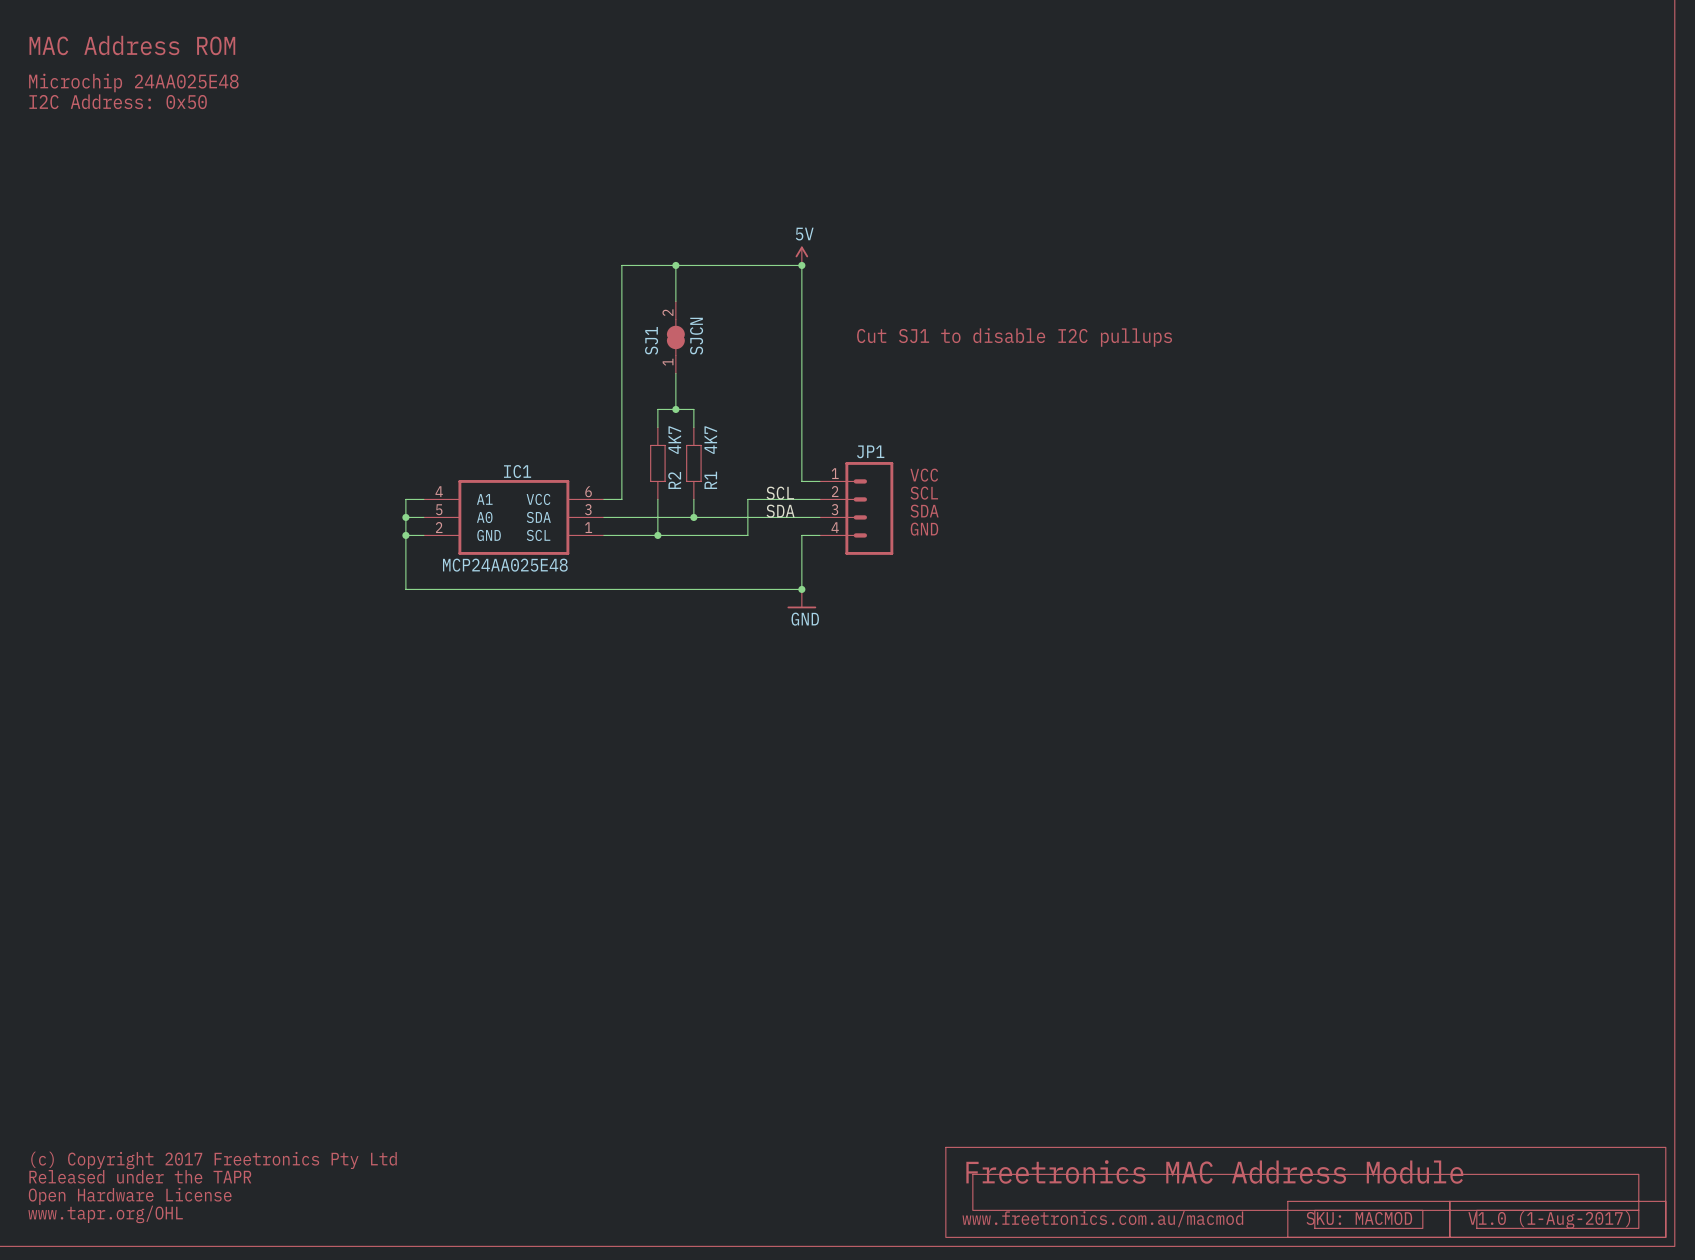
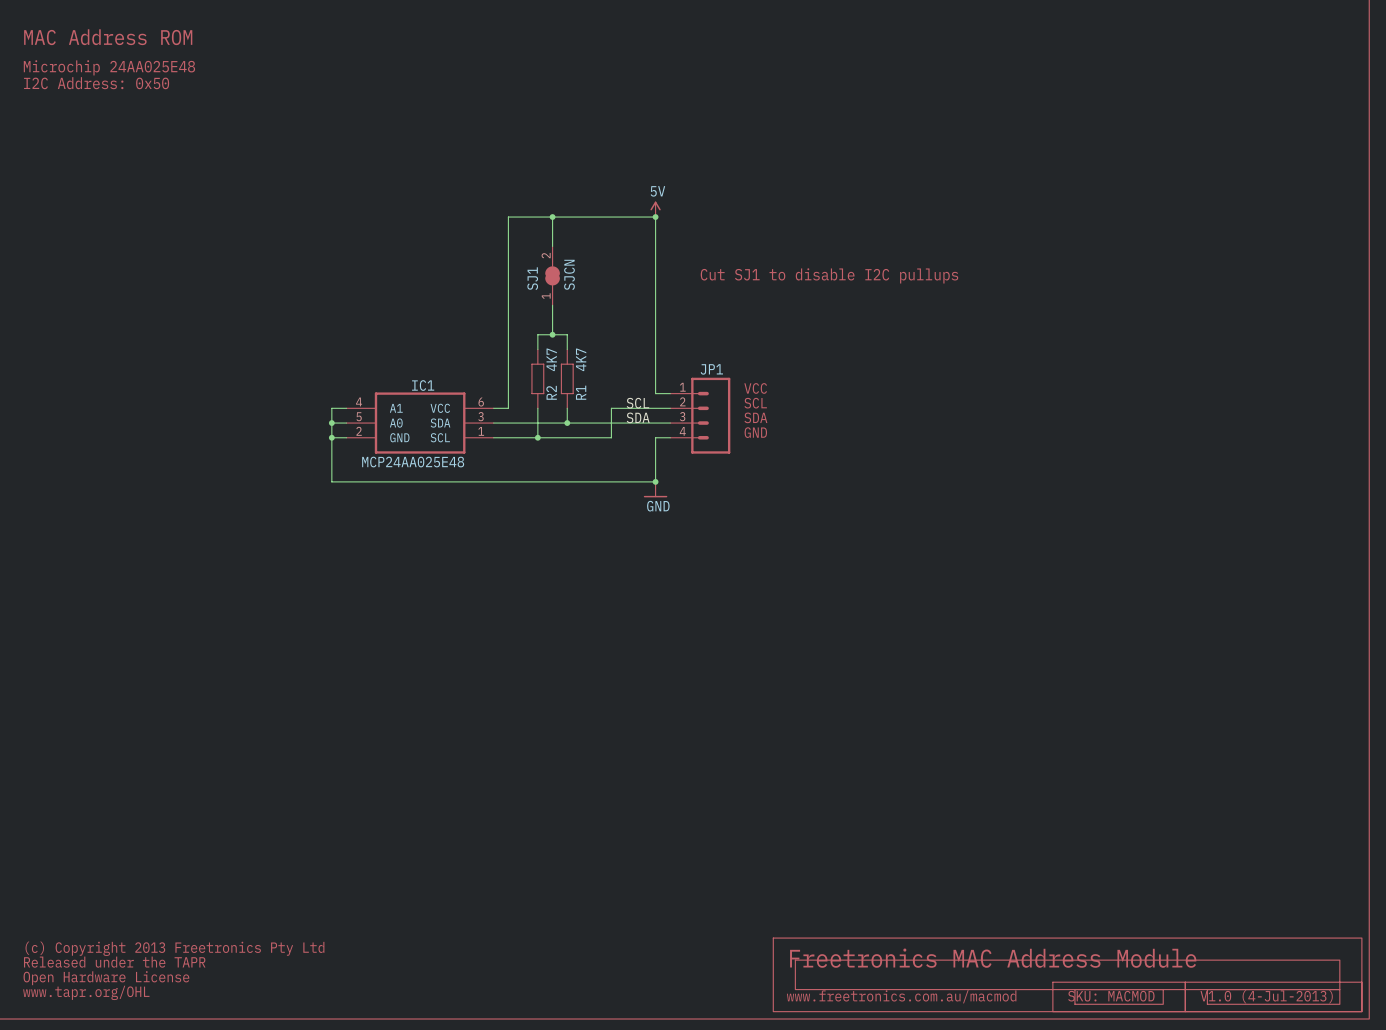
text: (c) Copyright 2017 Freetronics Pty Ltd (214, 1160) -> (c) Copyright 2013 Freetronics Pty Ltd (174, 948)
text: V1.0 (1-Aug-2017) (1549, 1219) -> V1.0 (4-Jul-2013) (1266, 996)

